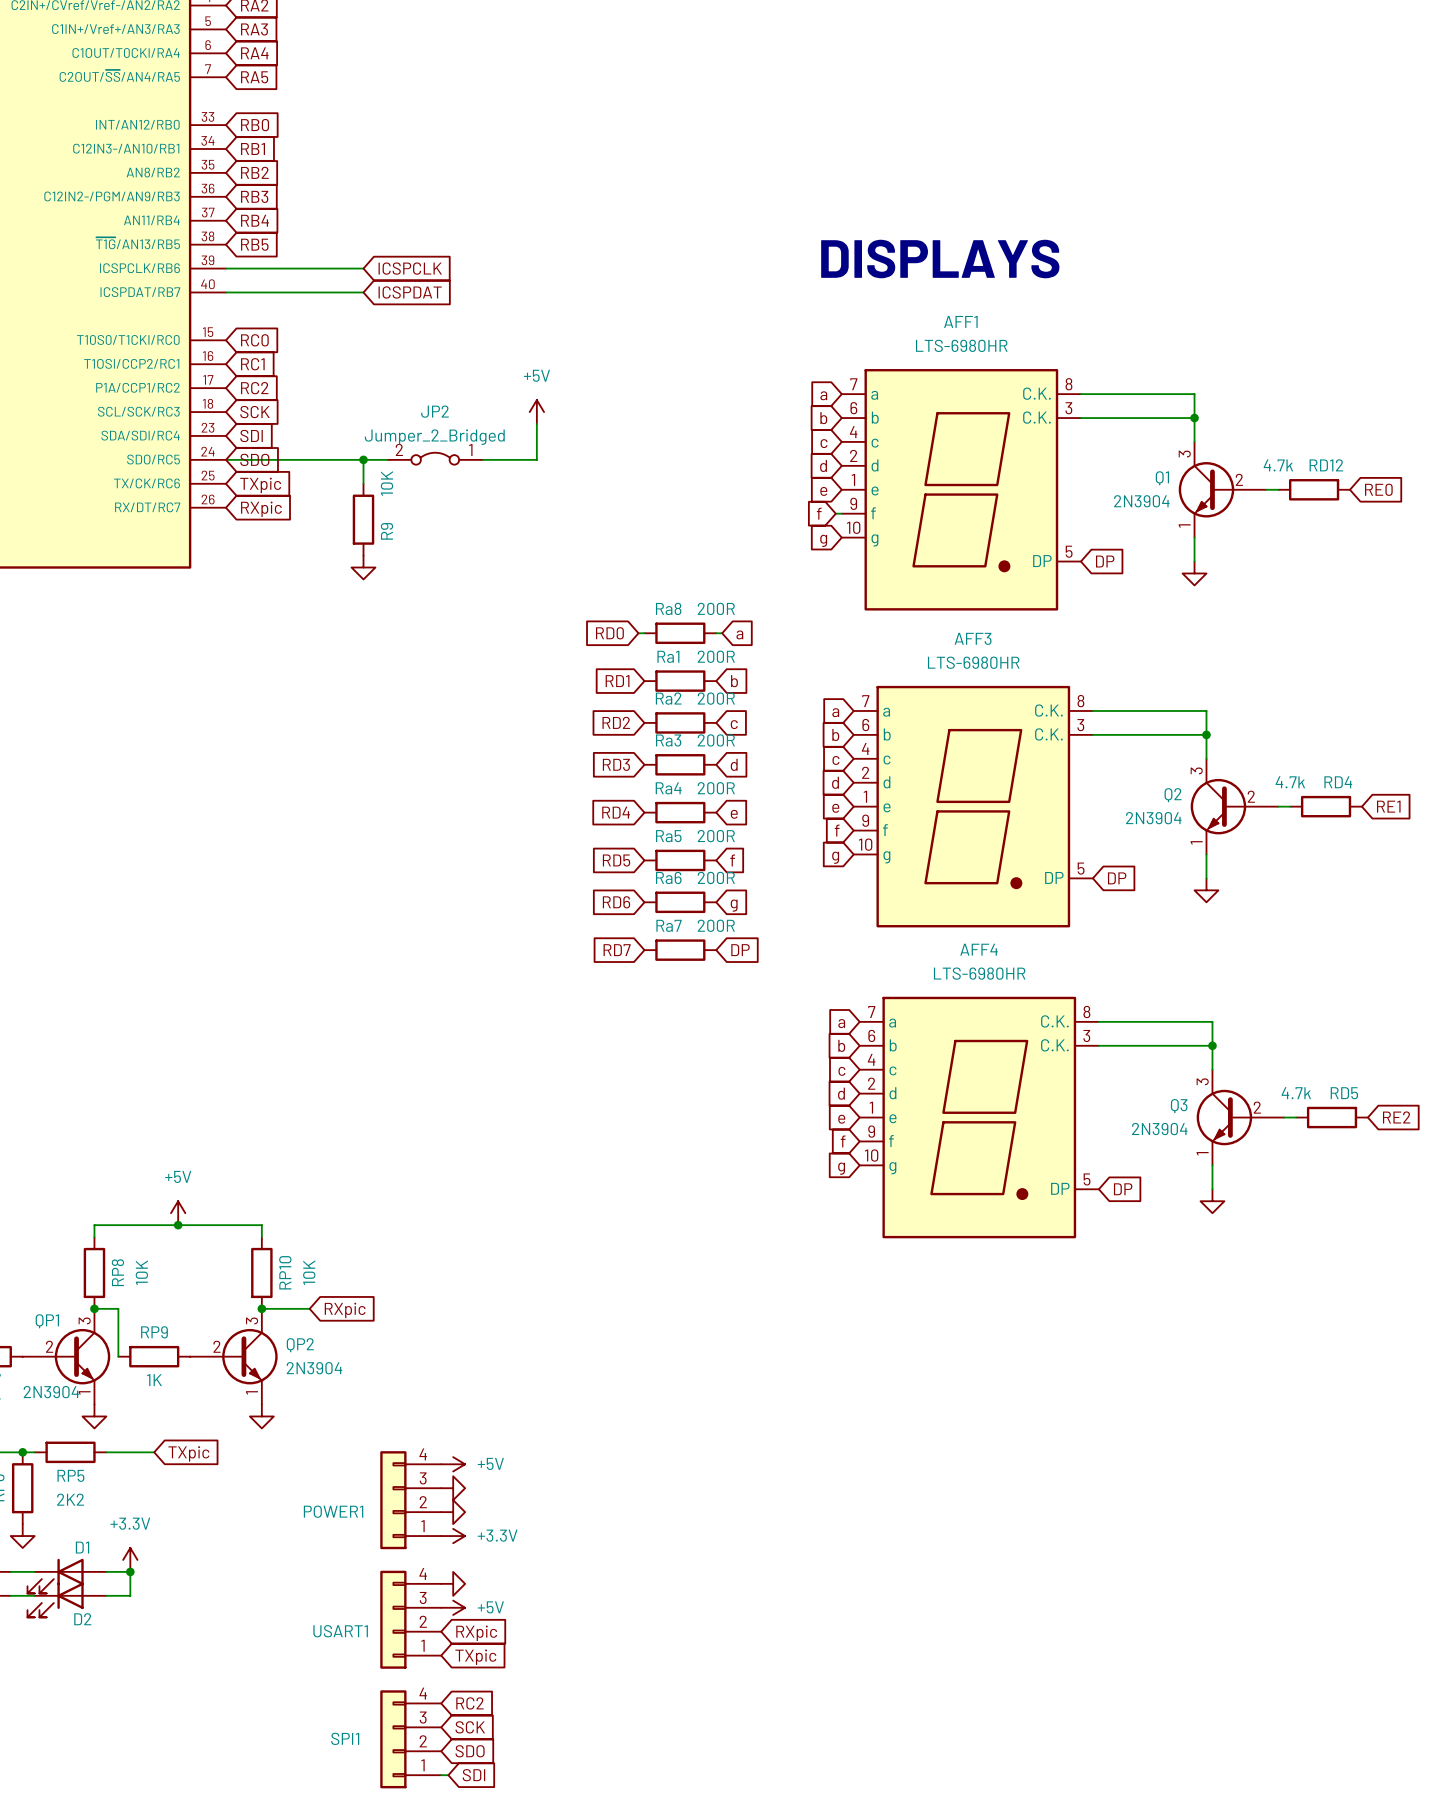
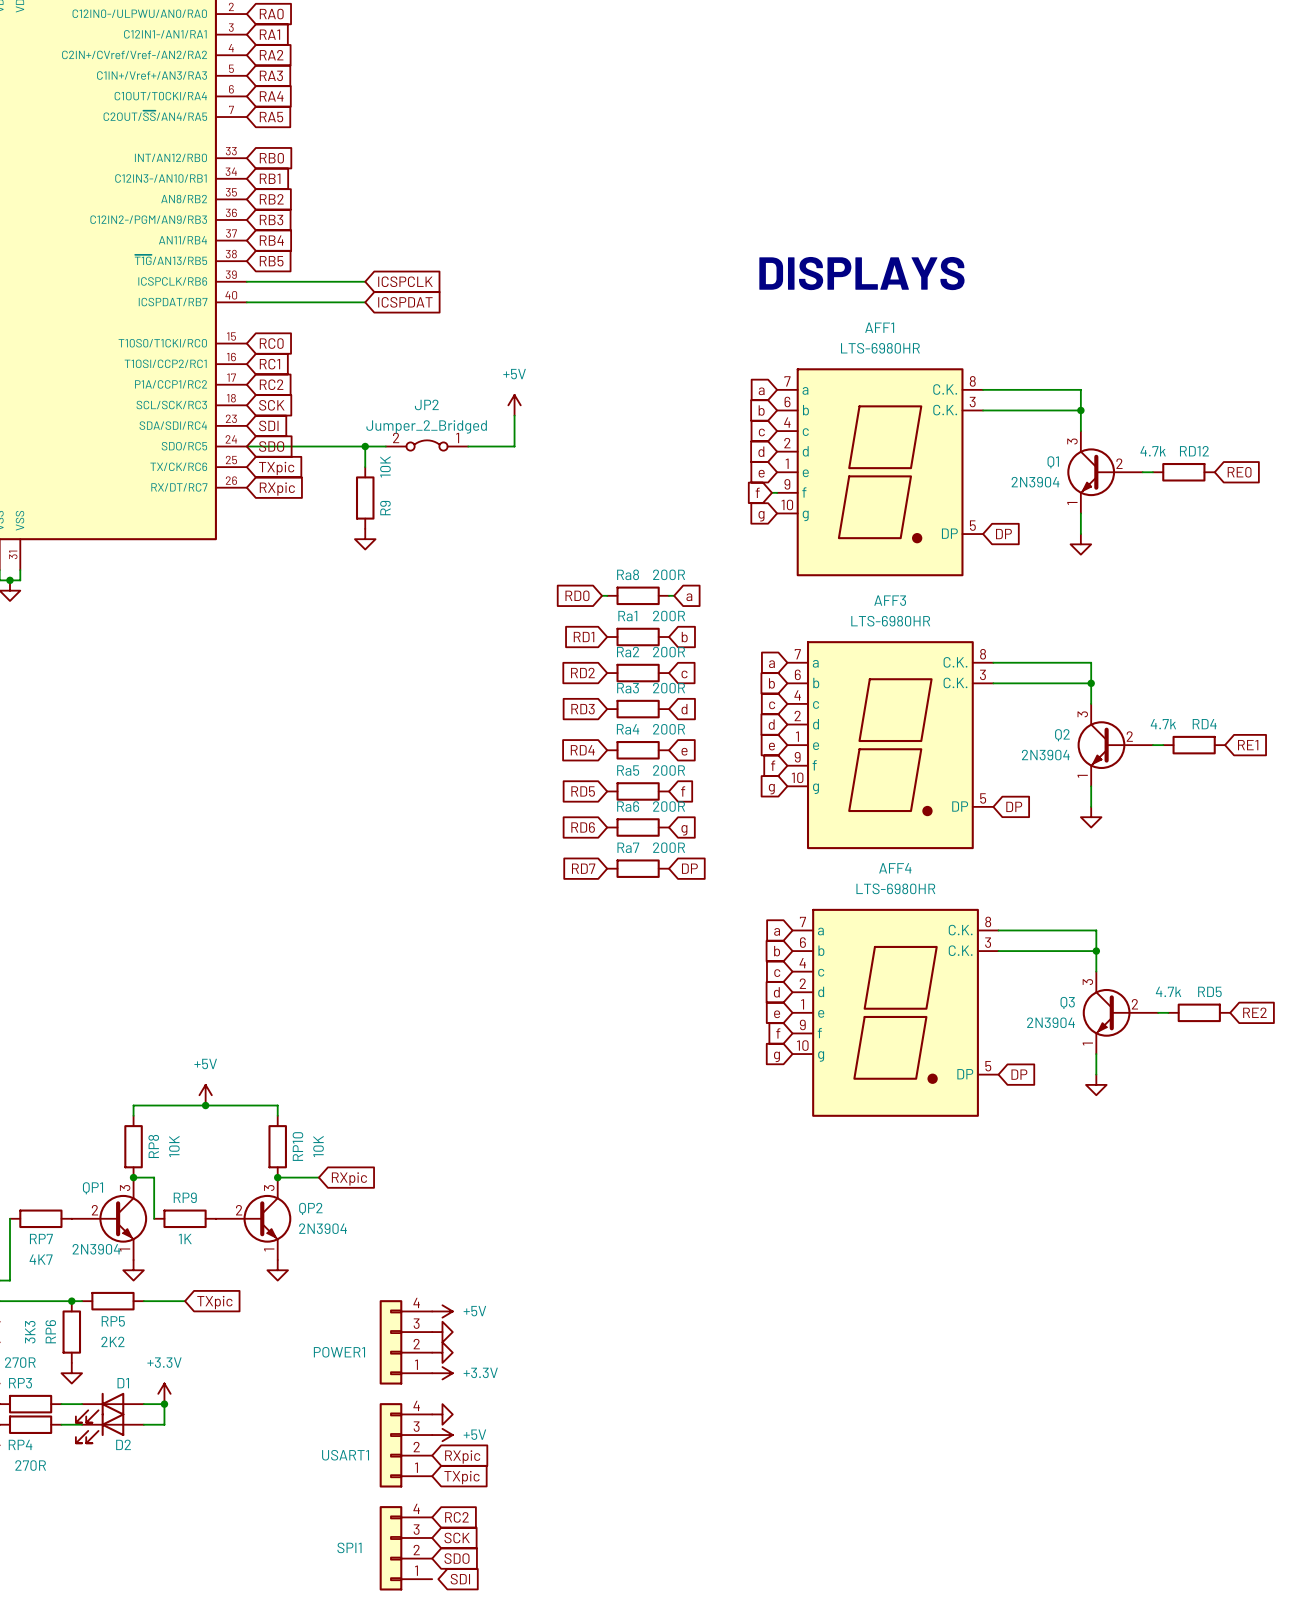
wire: (441, 1775) (448, 1775) -> none

